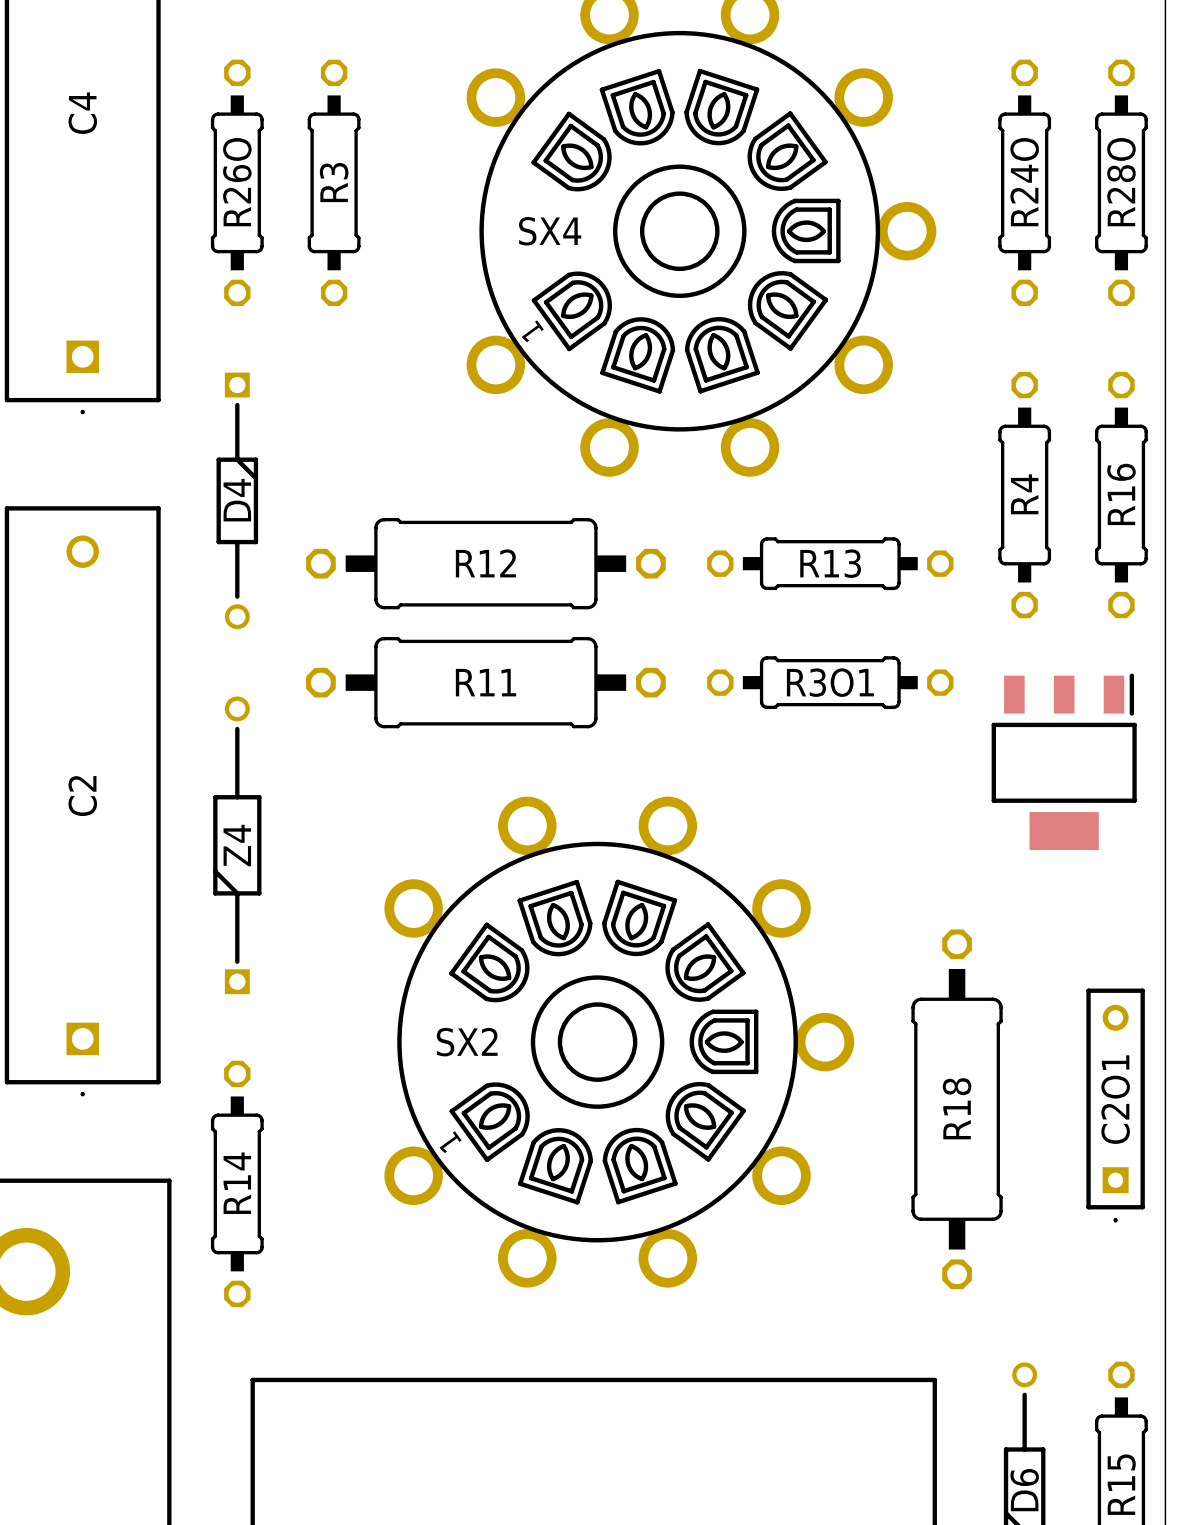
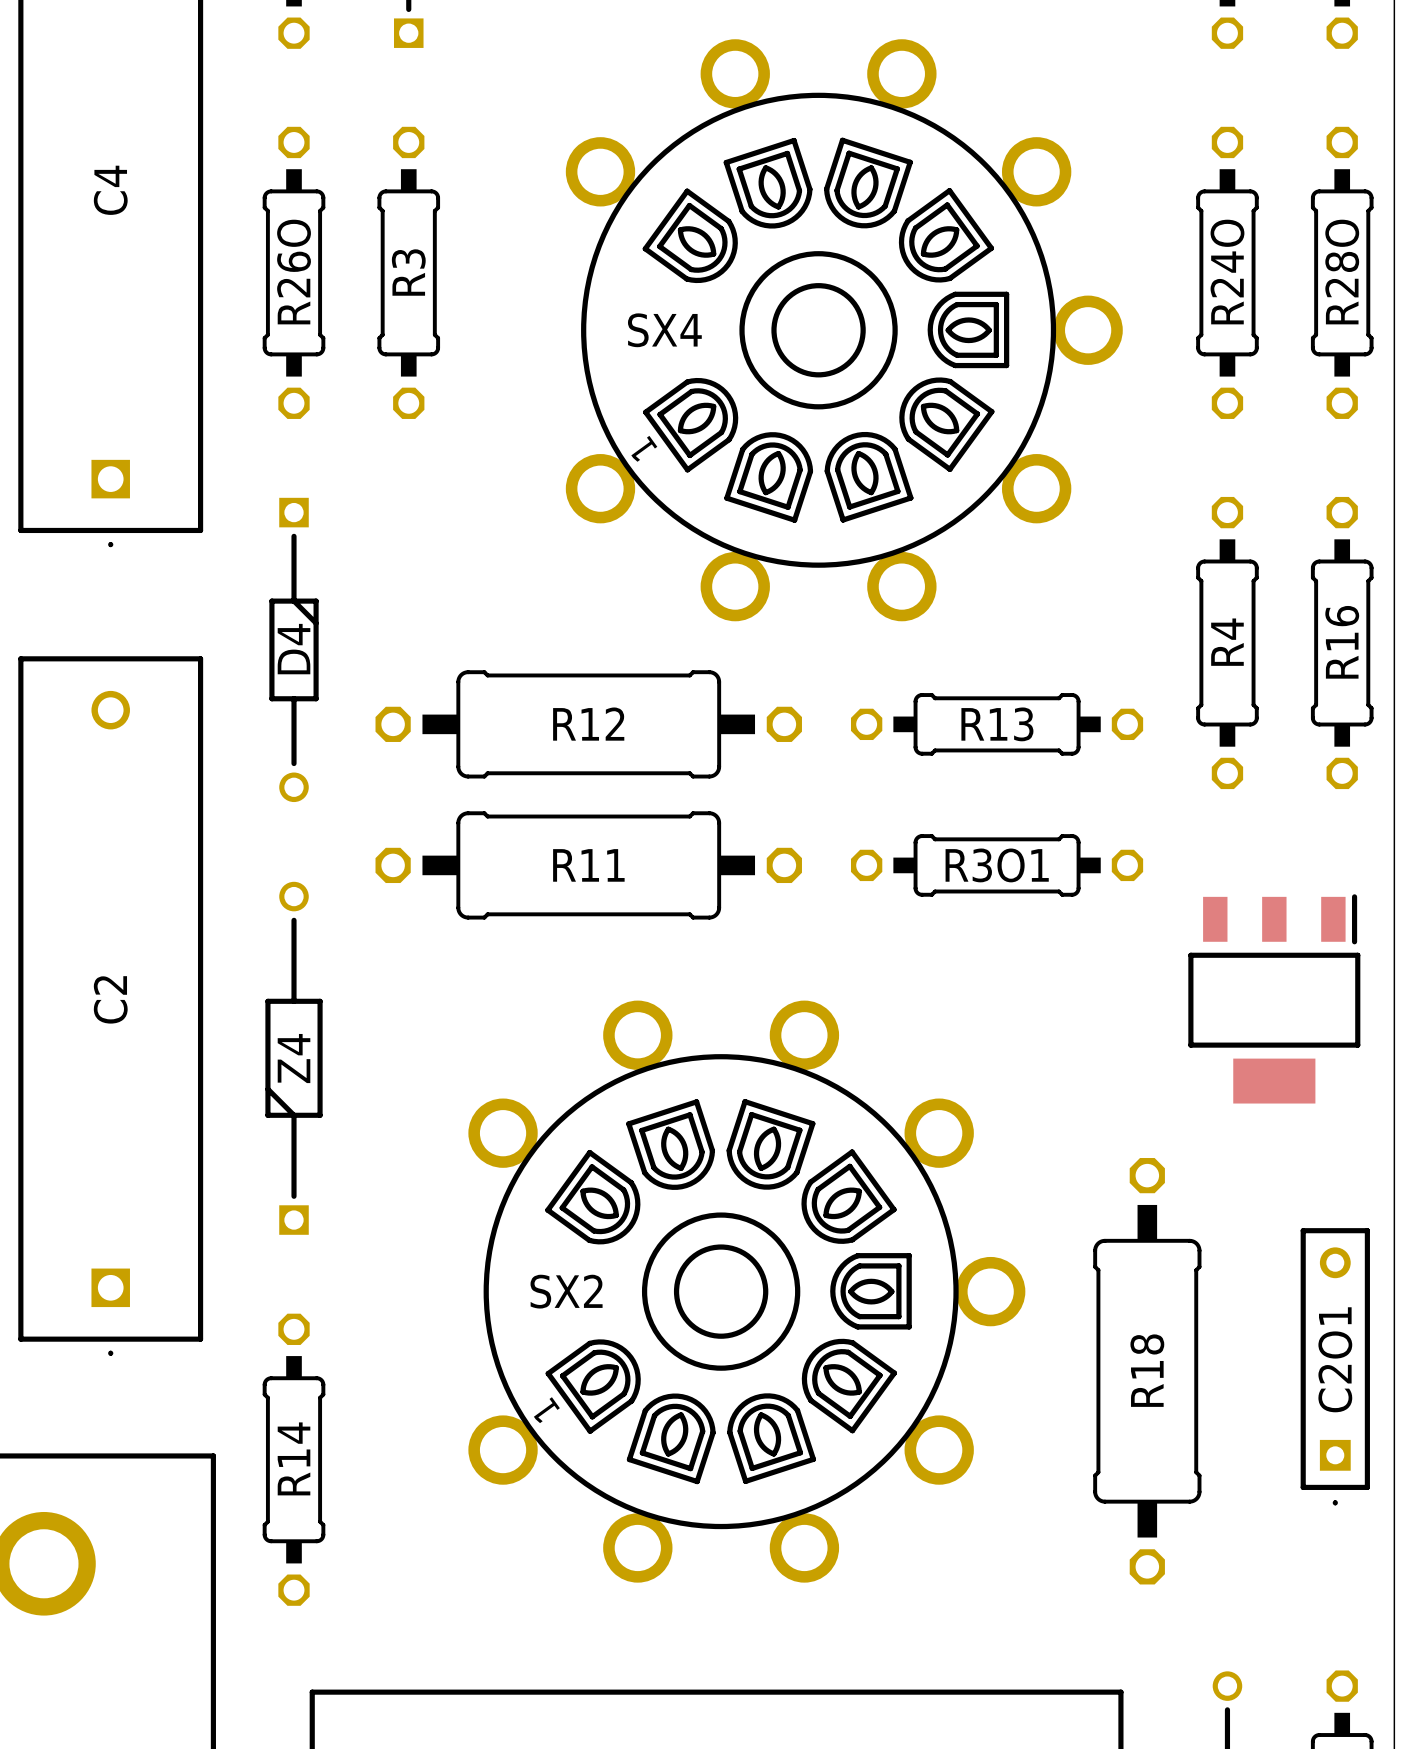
part position: (1064, 761) -> (1274, 998)

